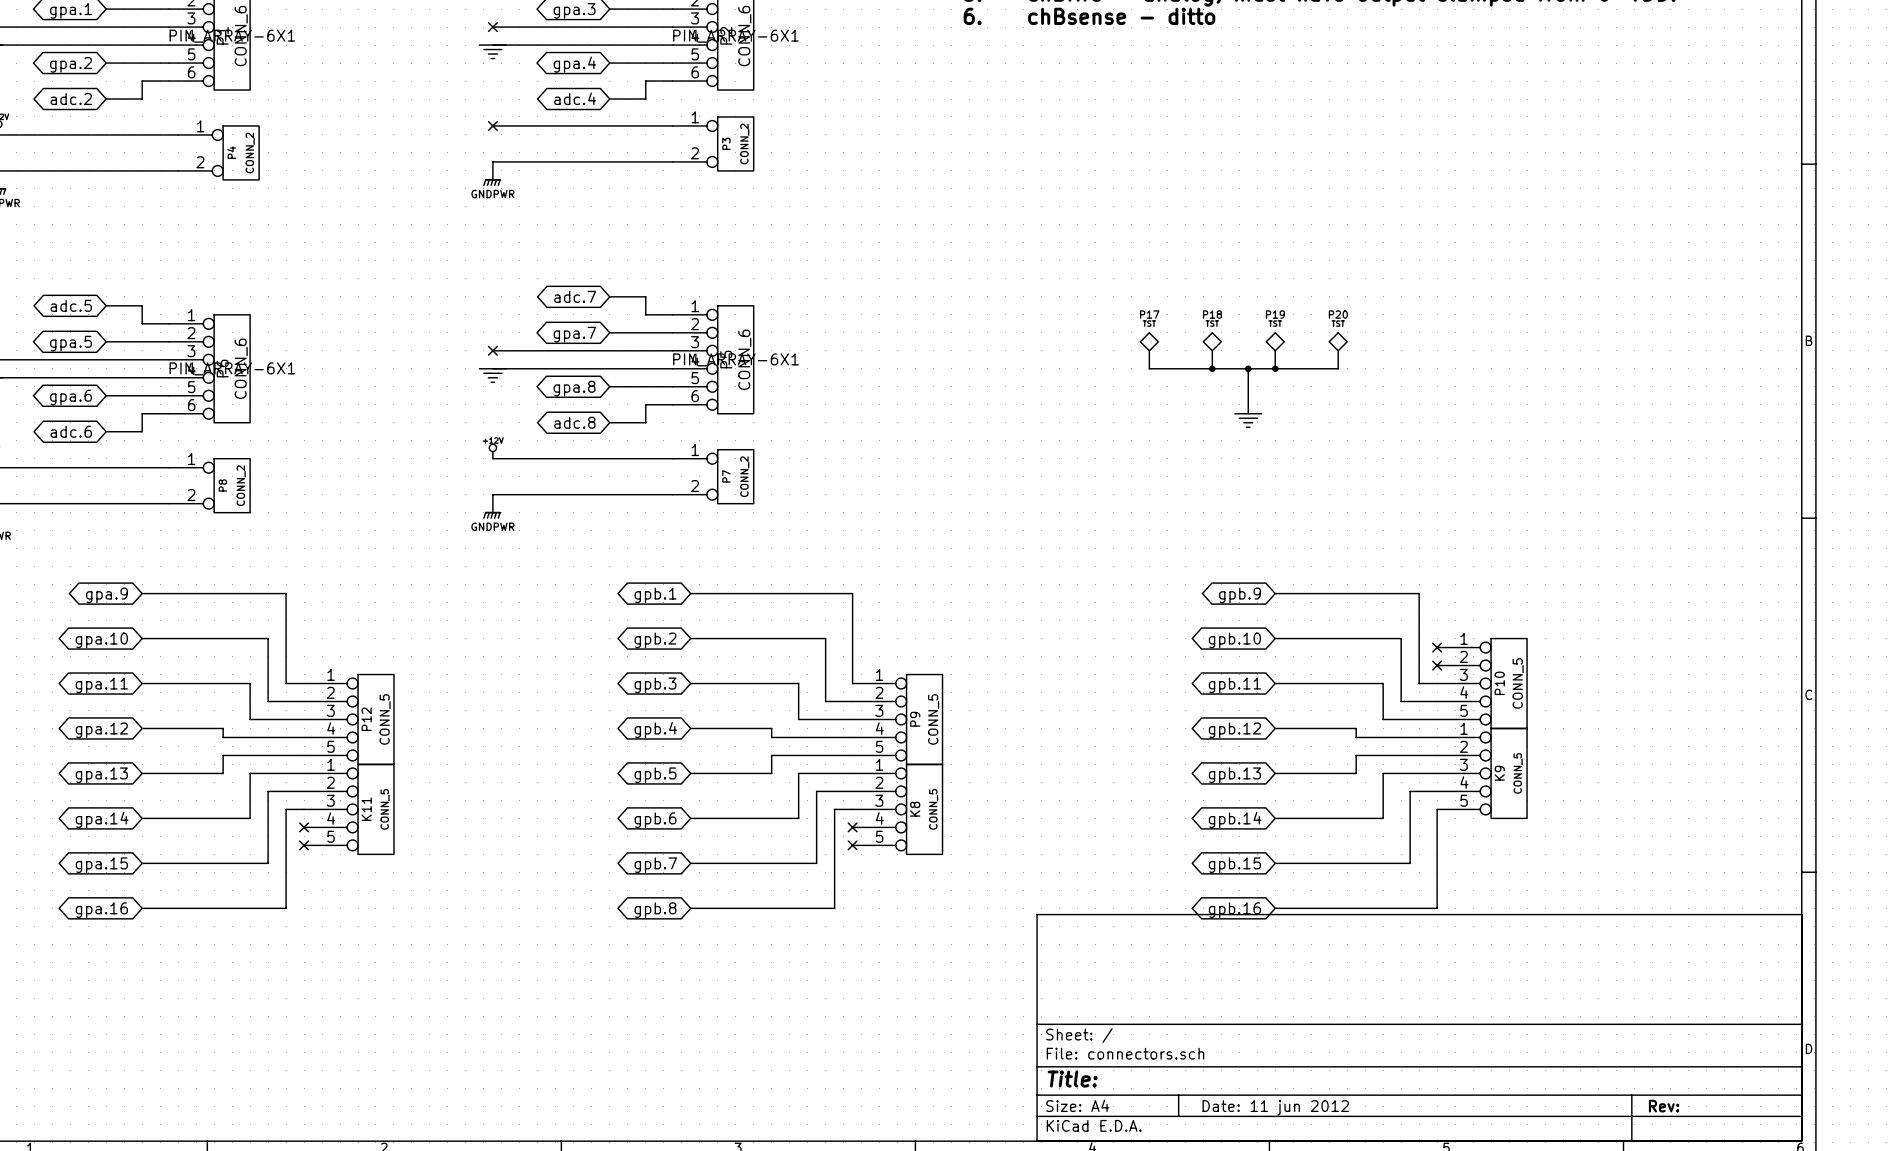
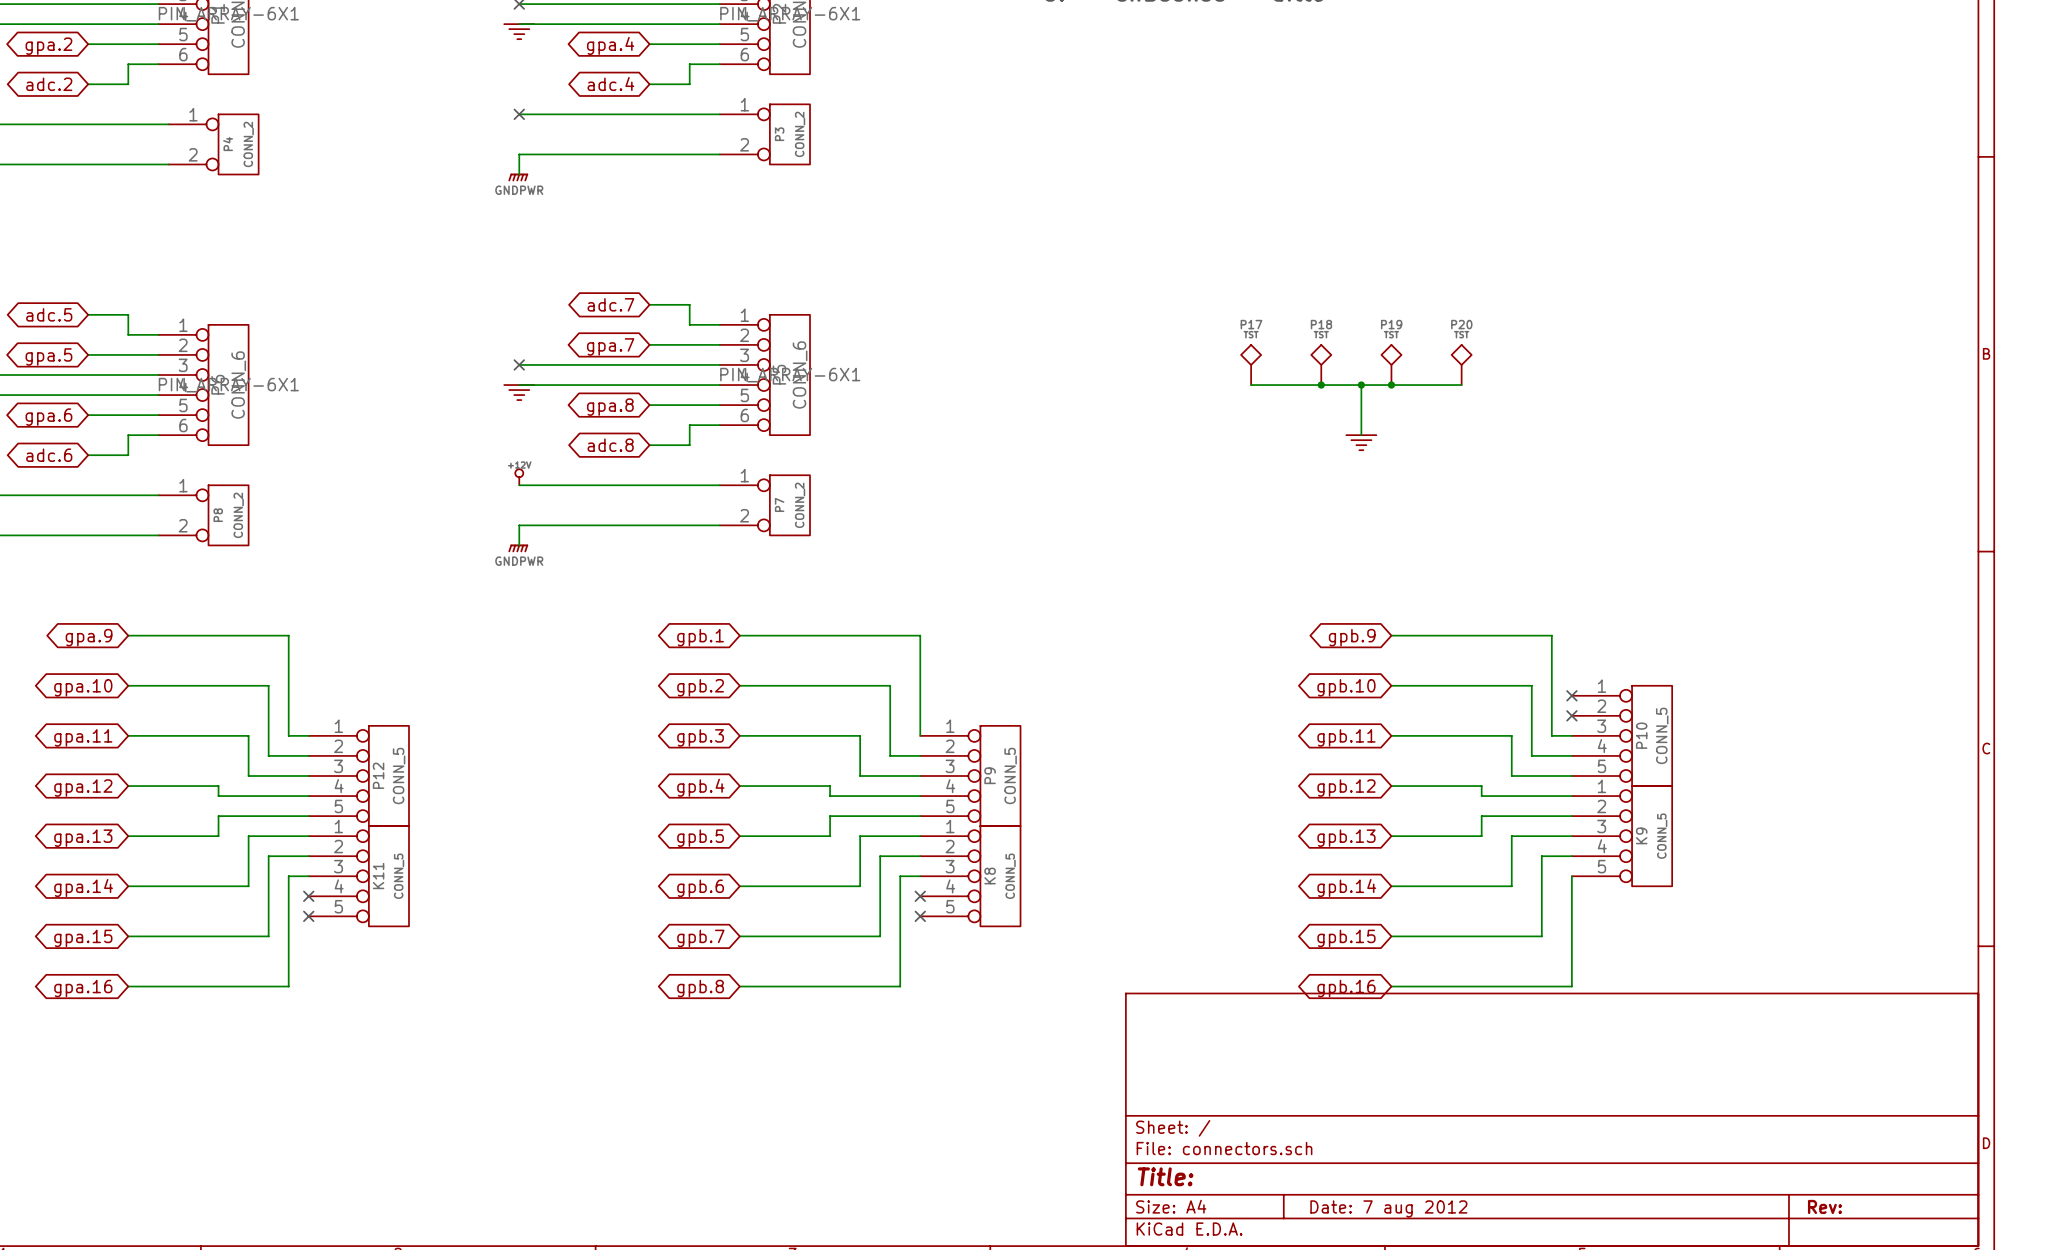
title block: Date: 11 jun 2012 (1275, 1107) -> Date: 7 aug 2012 (1388, 1208)

